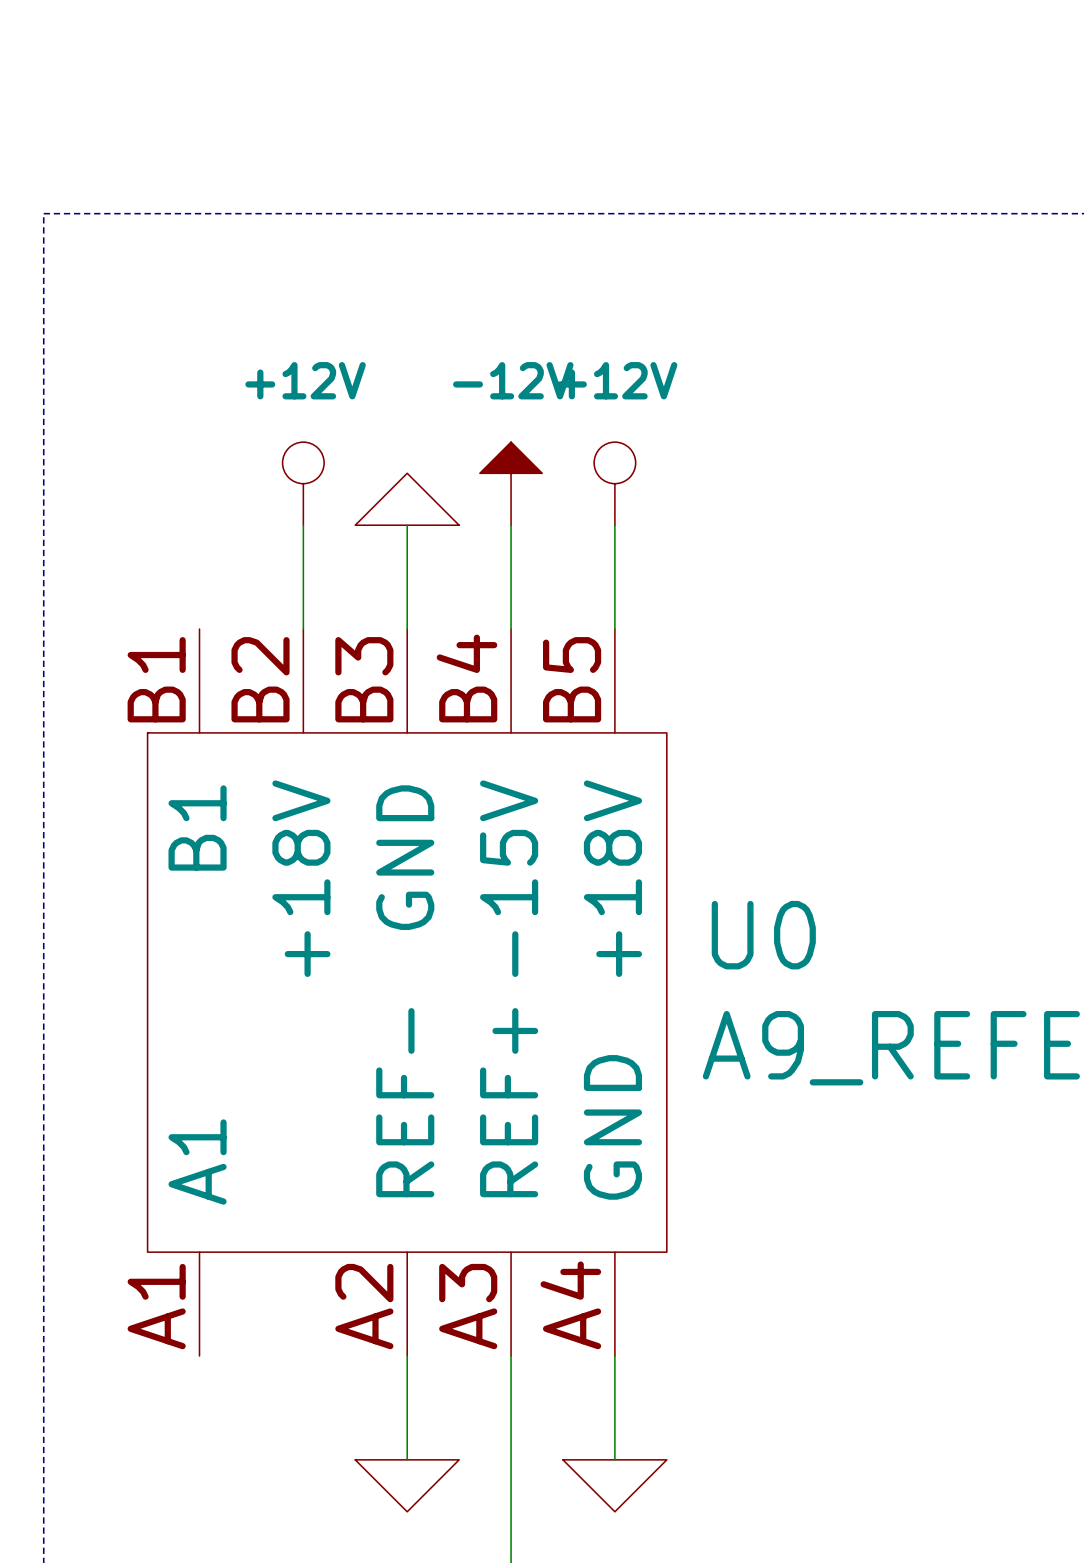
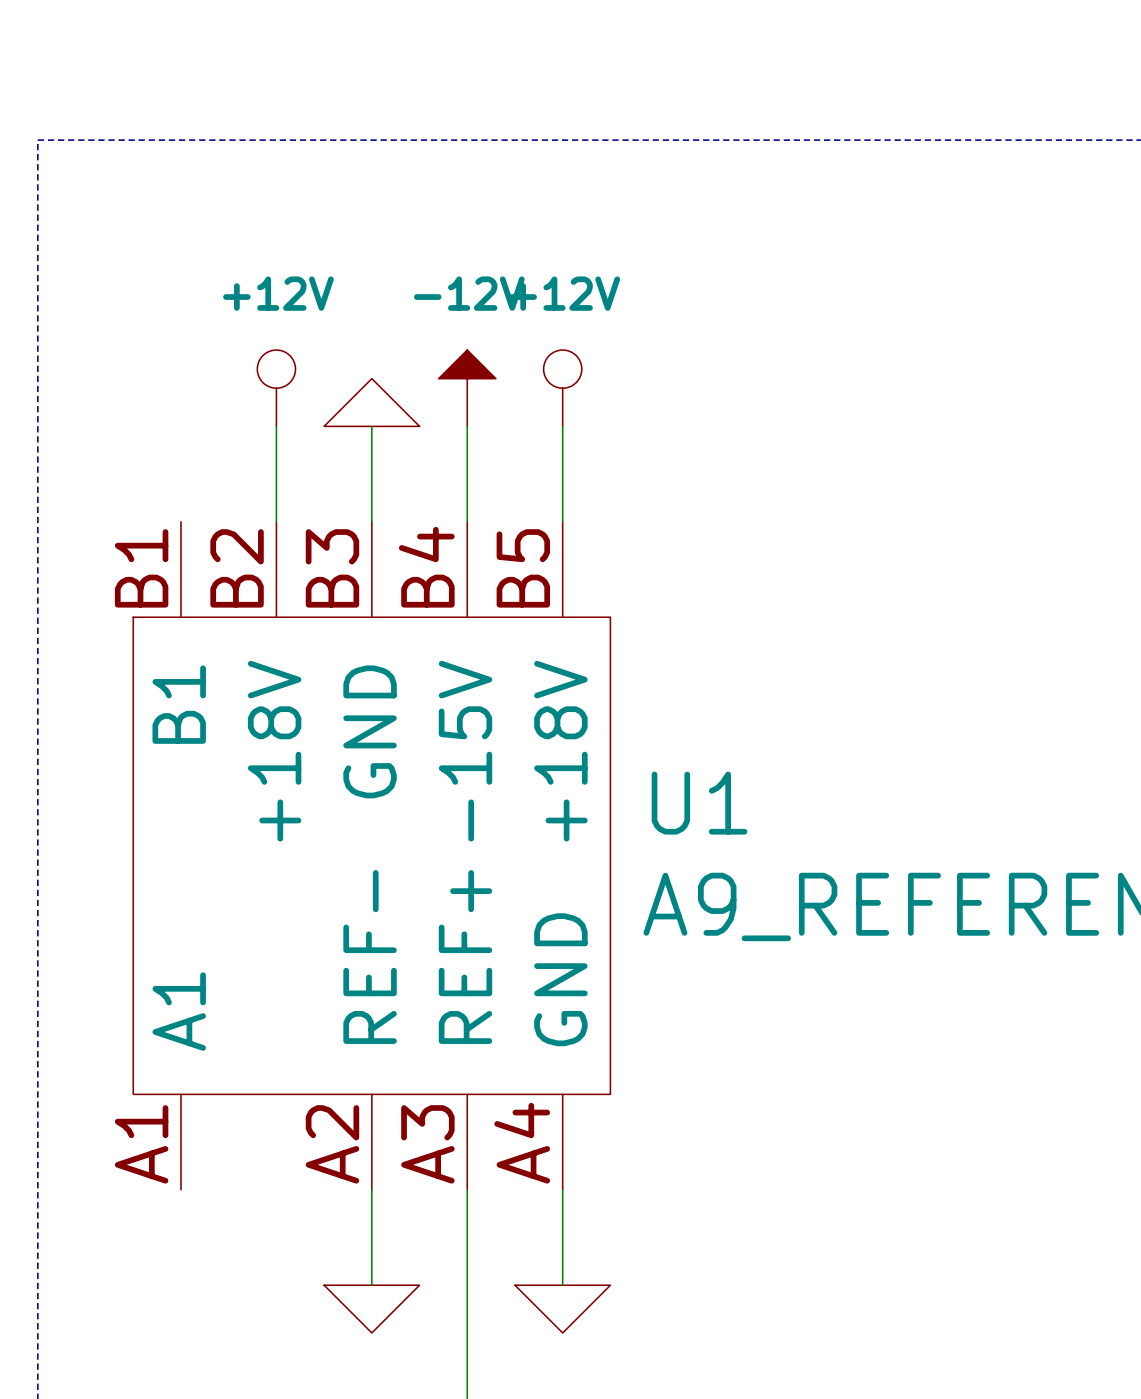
U0 name: U0 (763, 935) -> U1 (699, 803)

